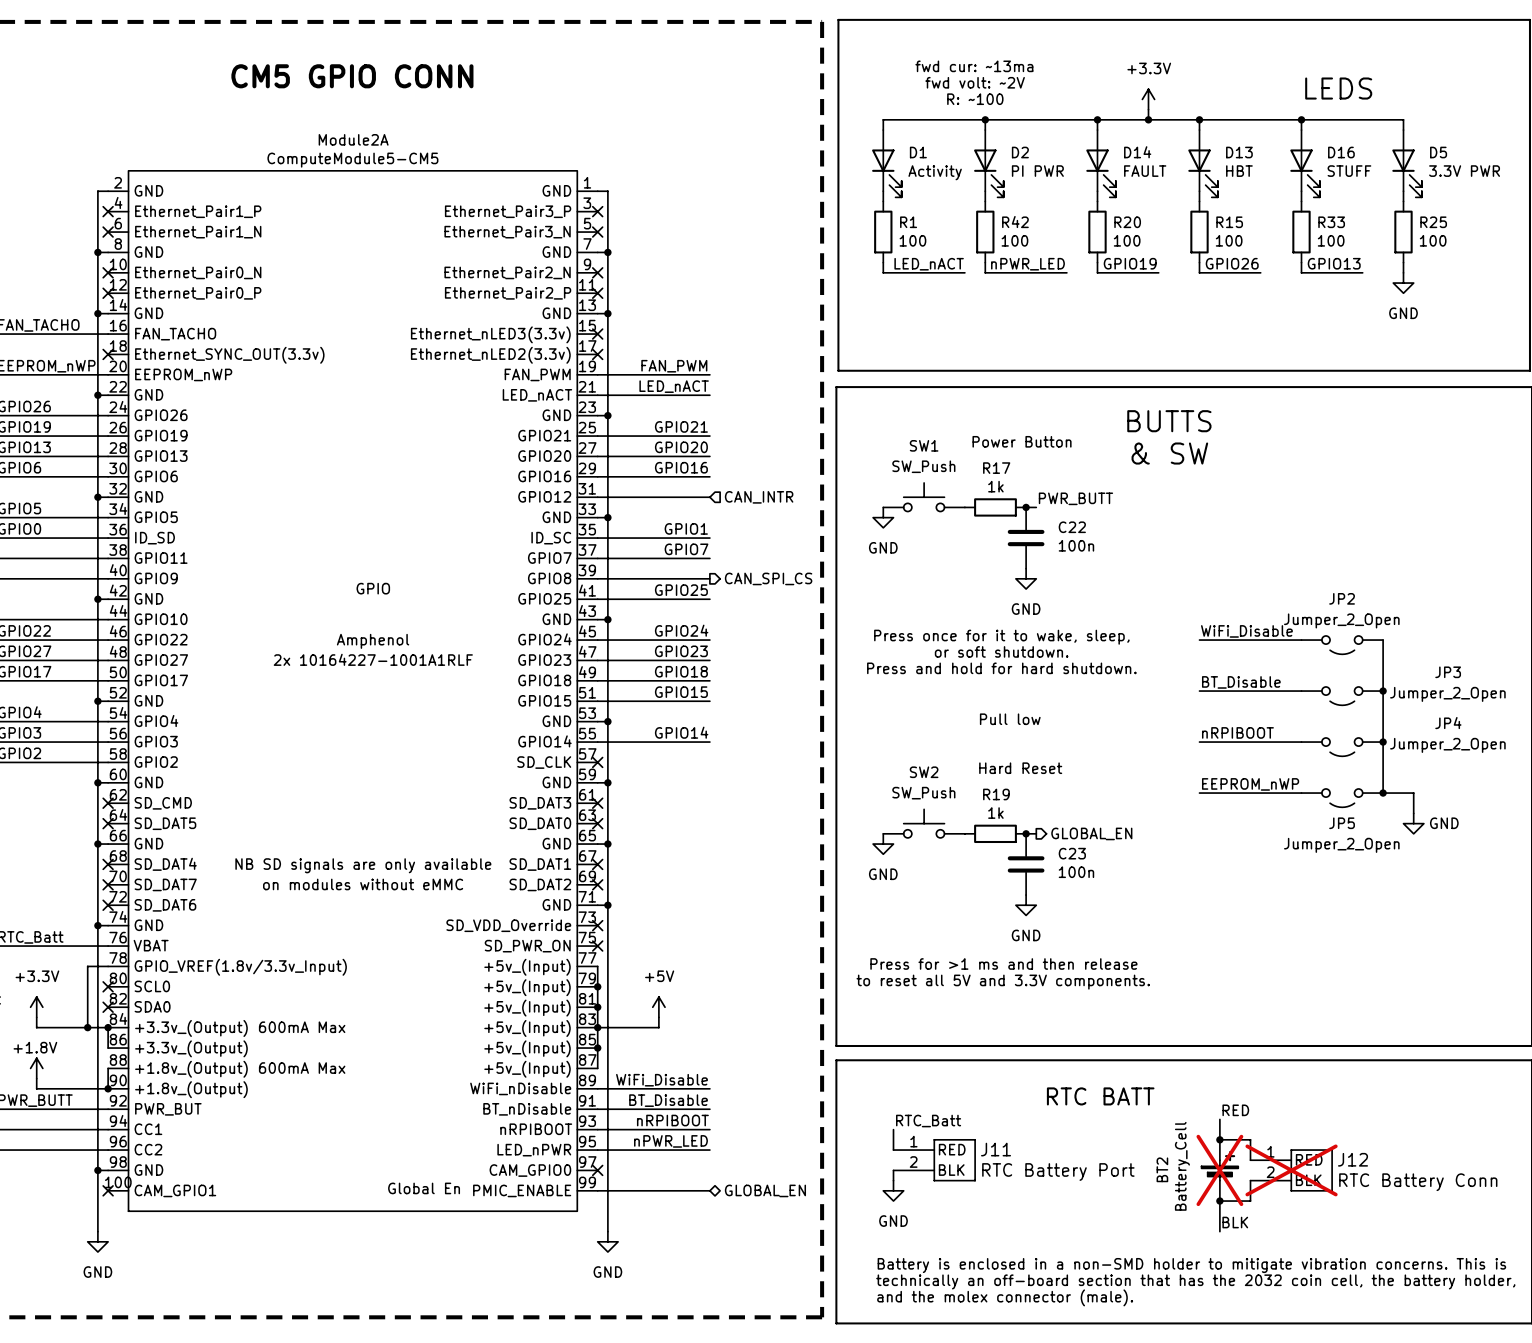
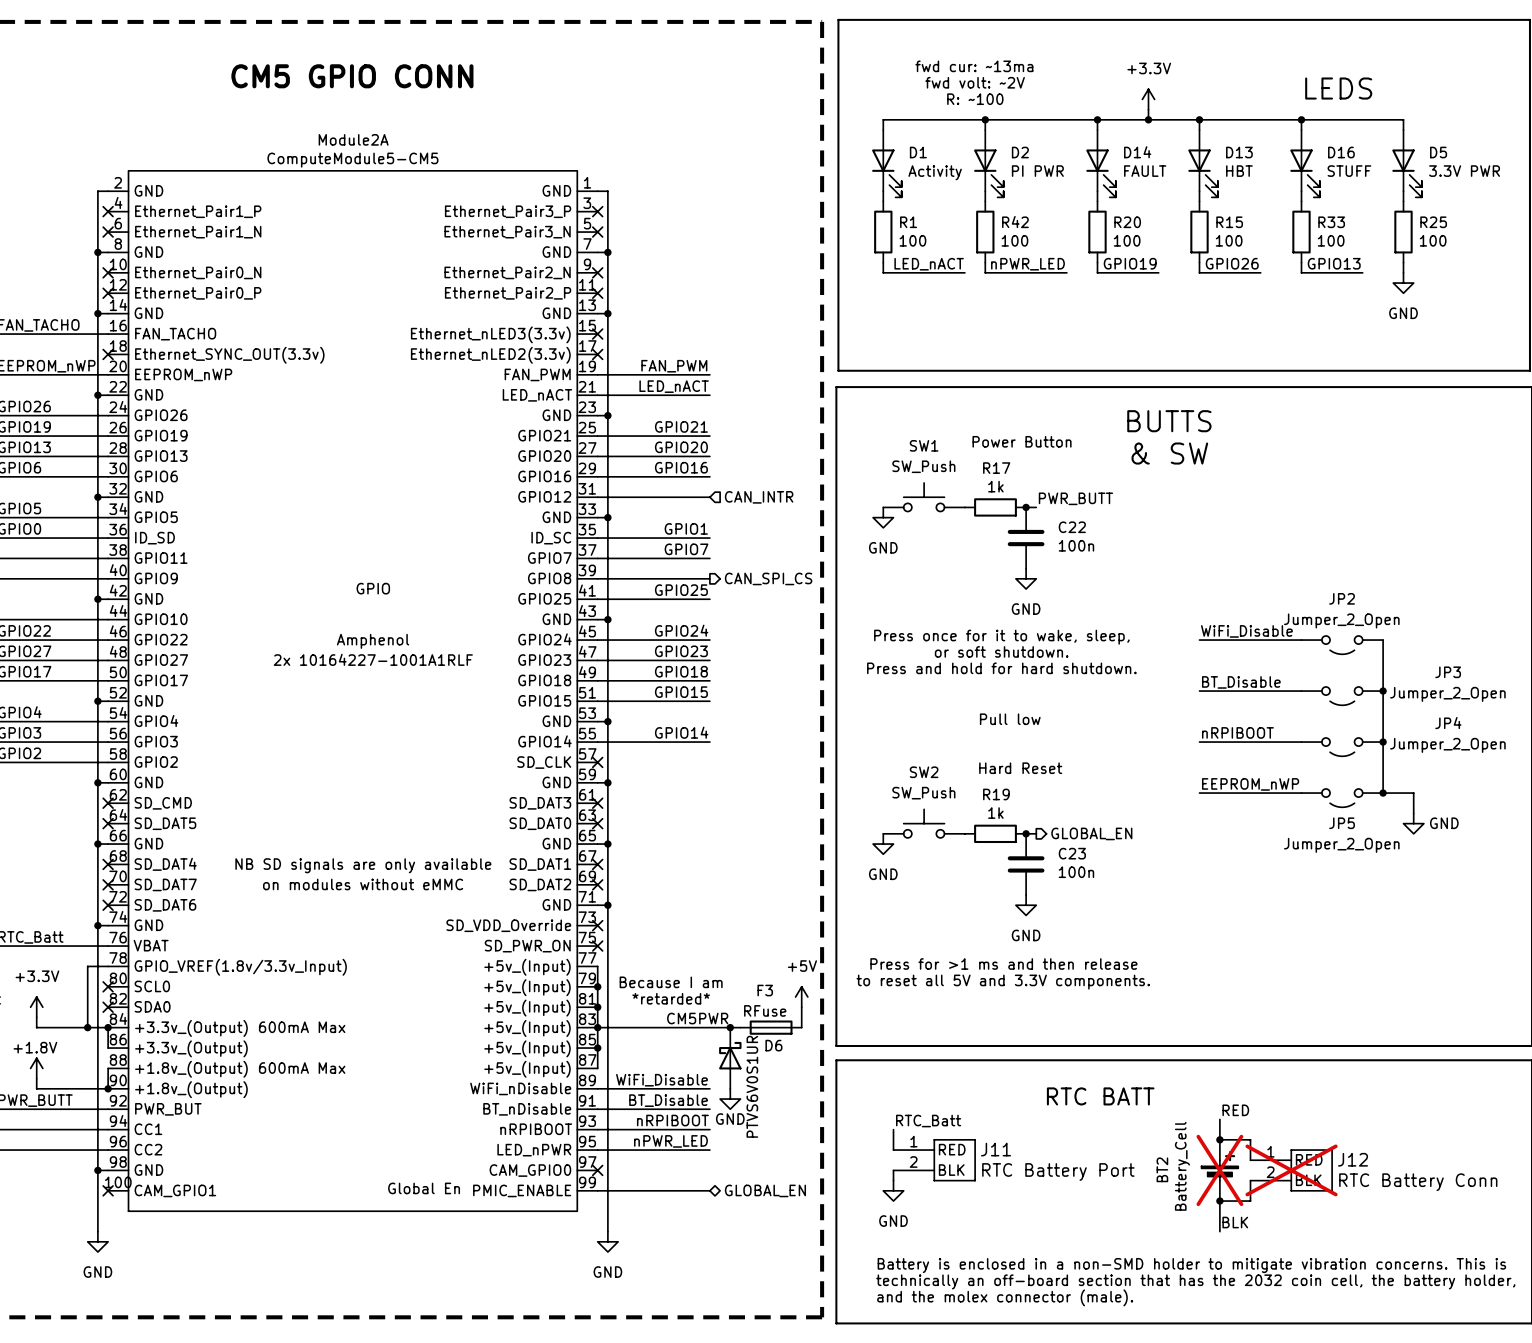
text: none -> Because I am (671, 982)
text: none -> *retarded* (671, 998)
power symbol position: +5V (658, 1007) -> +5V (801, 997)
wire: none -> (801, 1007) (801, 1027)
wire: (658, 1017) (658, 1027) -> (740, 1027) (658, 1027)
label: none -> CM5PWR (697, 1018)
junction: none -> (730, 1027)
F3: none -> RFuse (771, 1027)
D6: none -> PTVS6V0S1UR (730, 1058)
power symbol: none -> GND (730, 1099)

